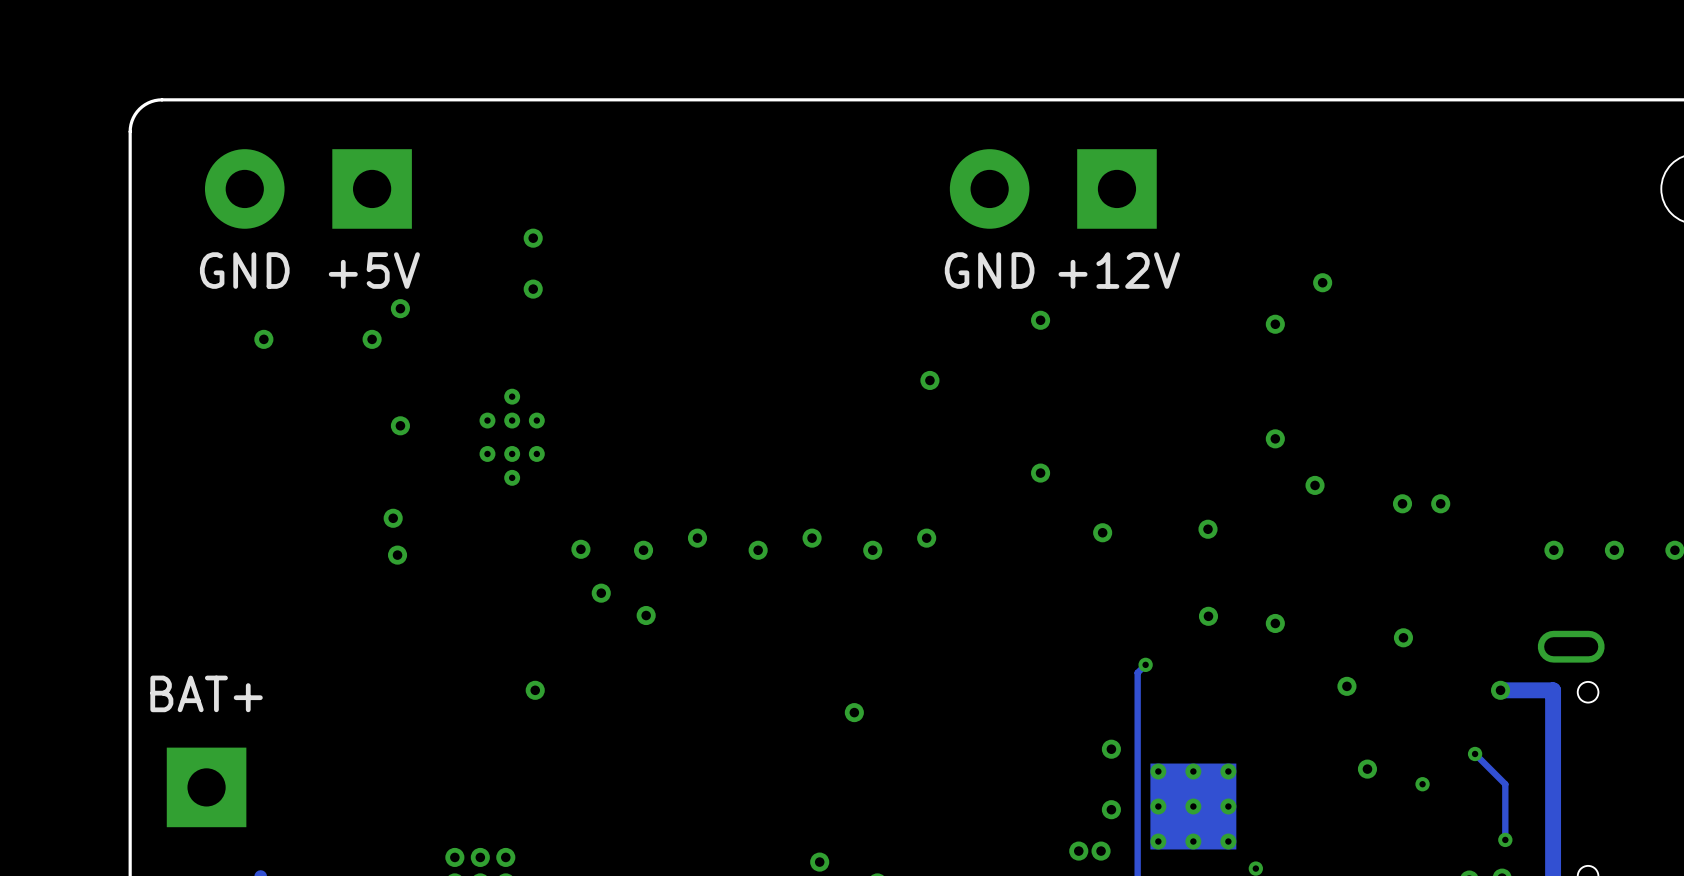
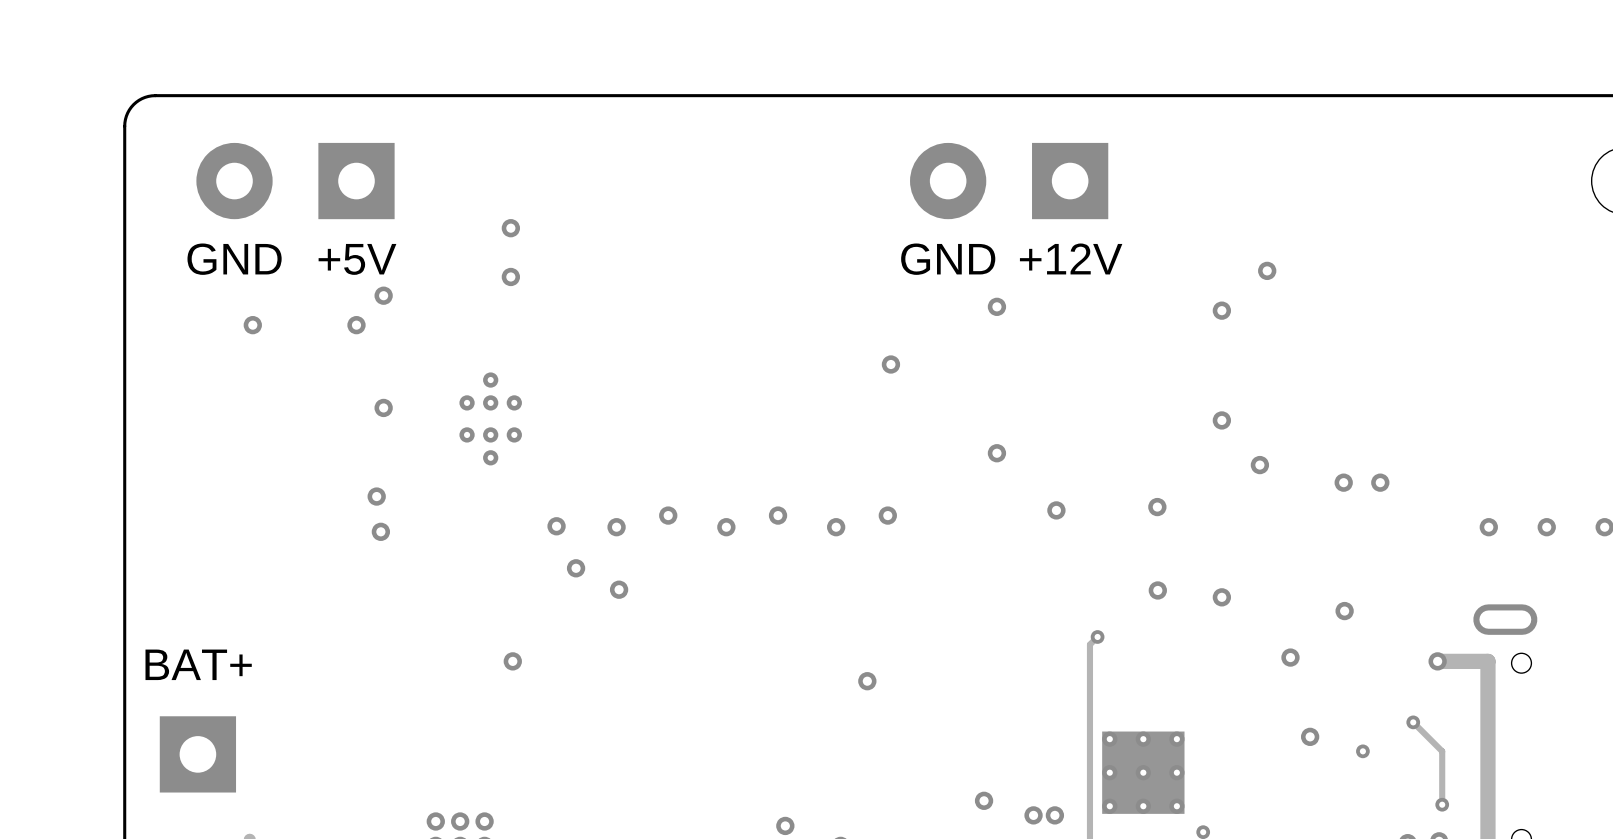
via position: (854, 712) -> (867, 681)
via: (1111, 749) -> none
via: (1111, 809) -> none
via: none -> (984, 800)

